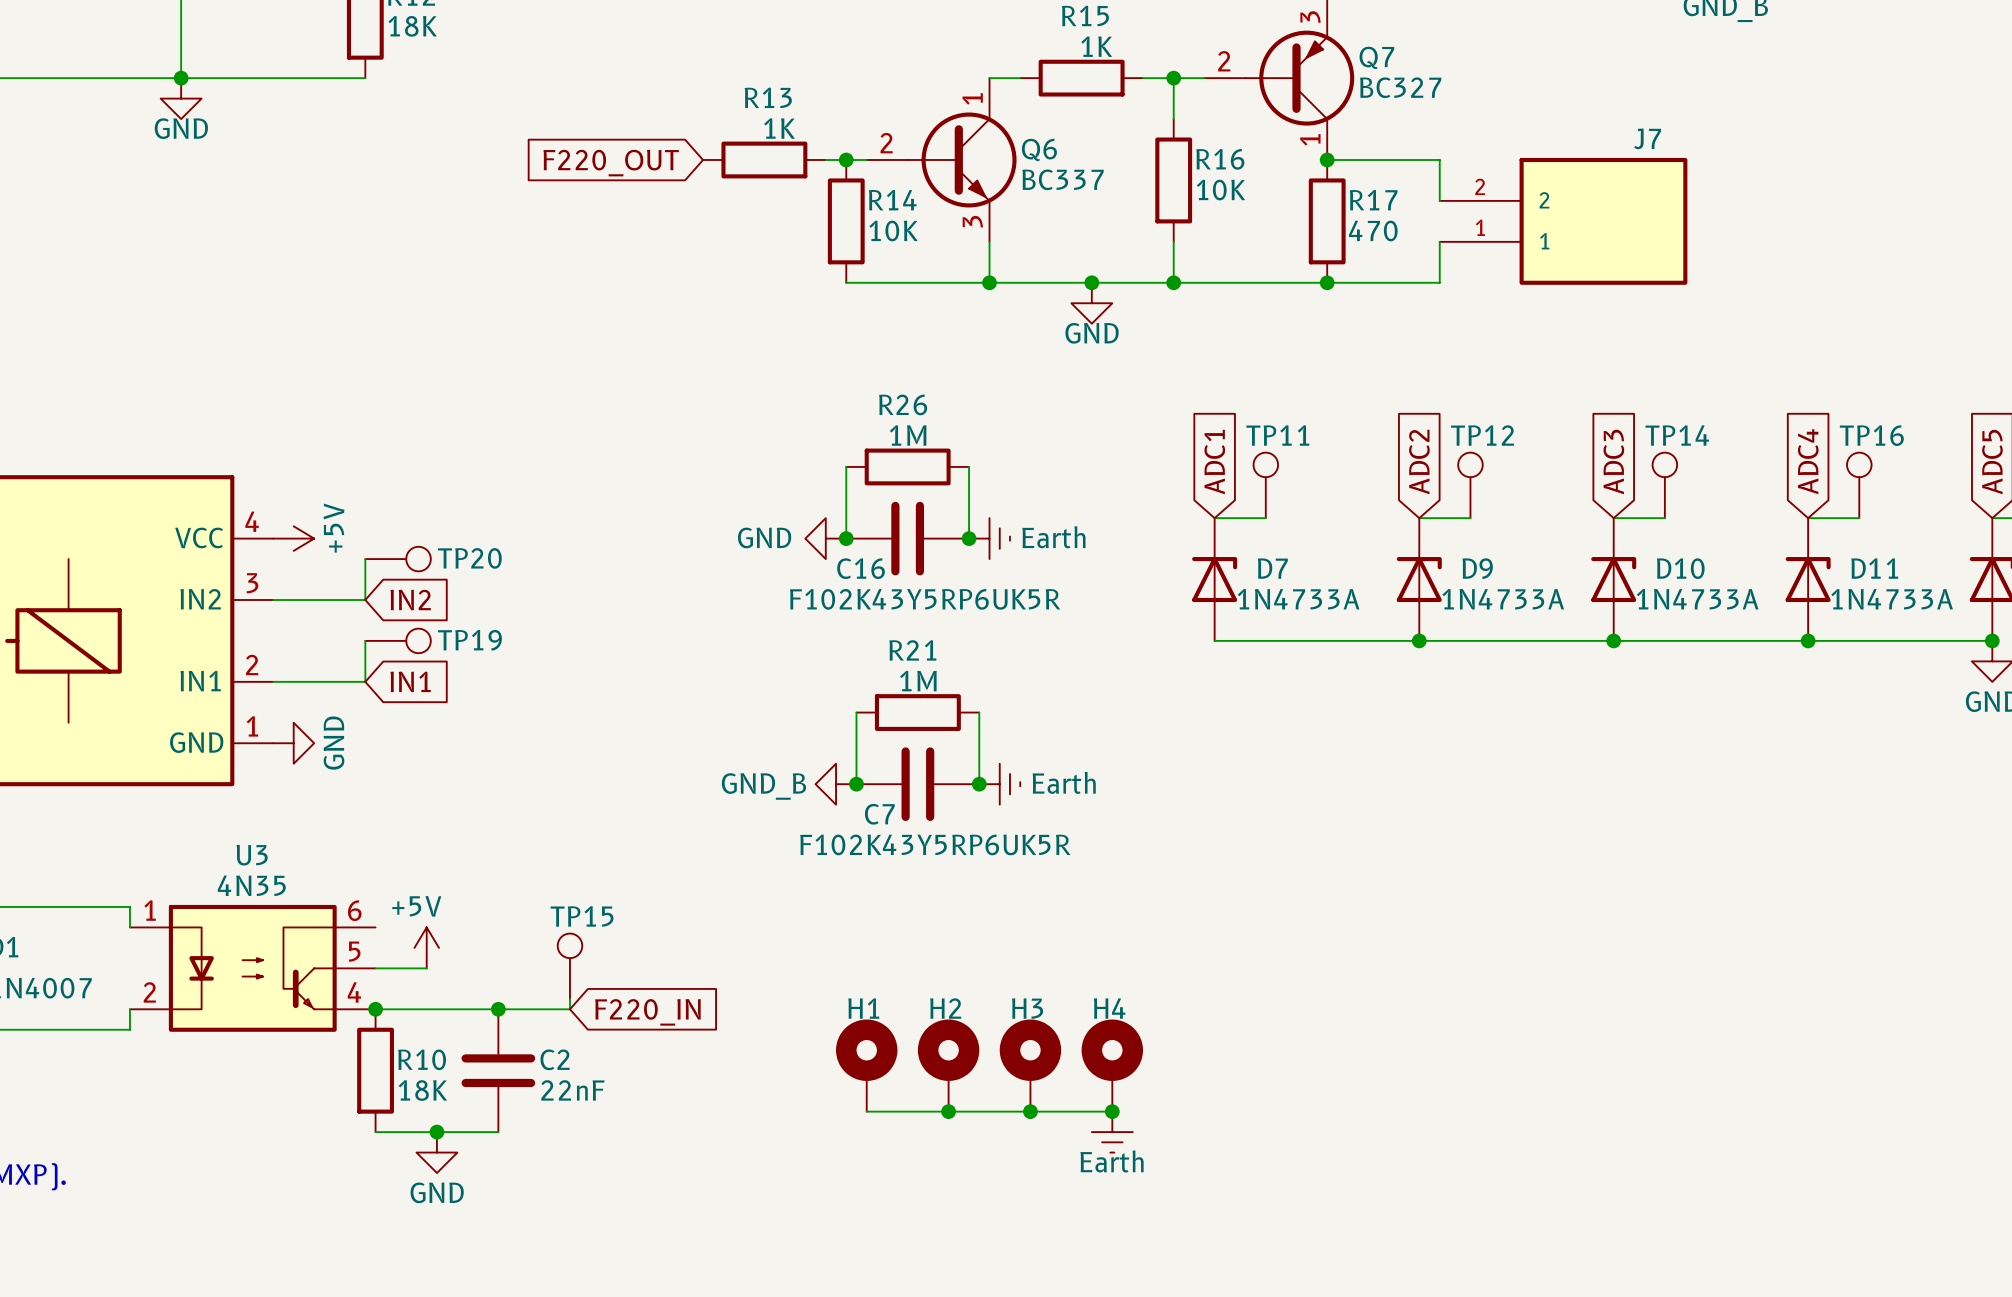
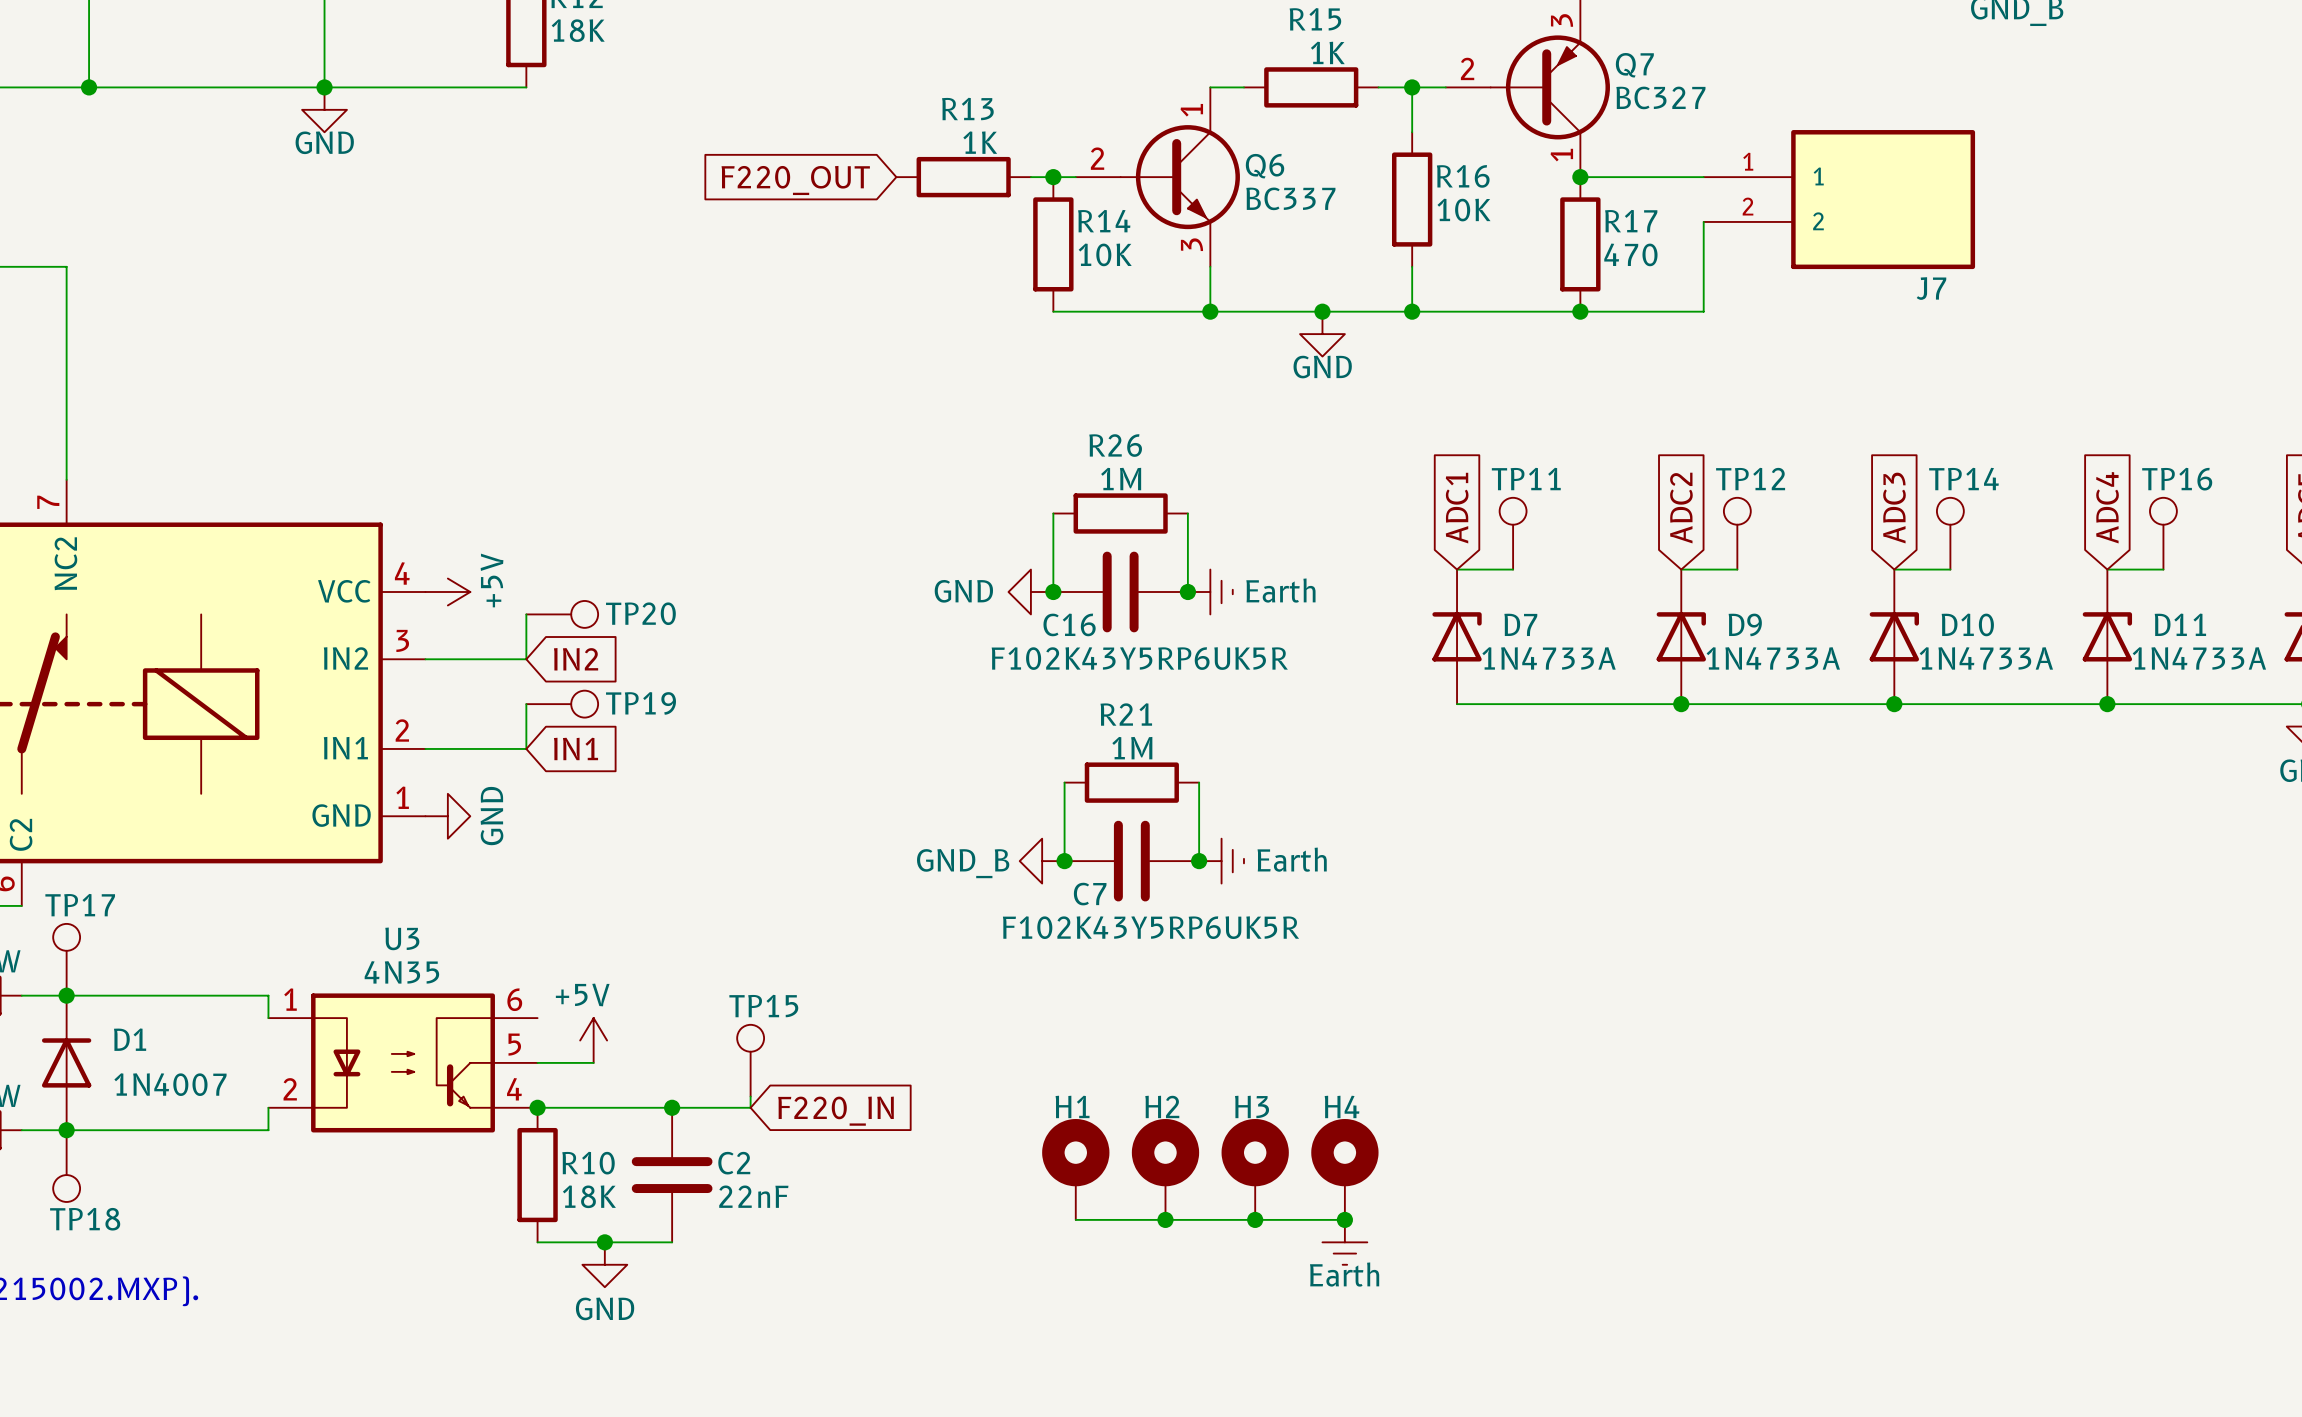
wire: (1439, 159) (1439, 200) -> (1703, 266) (1703, 221)
J7 flip: as is (1603, 221) -> up-down (1883, 199)

